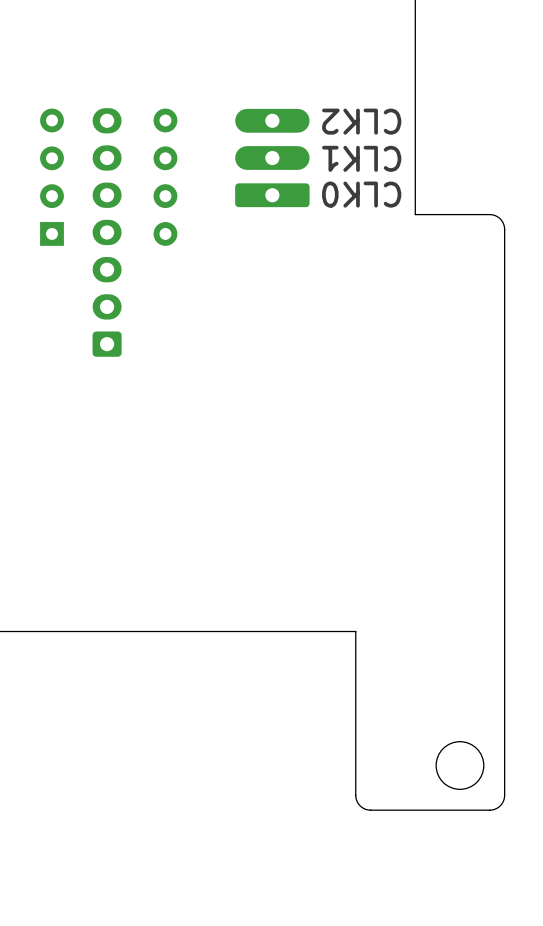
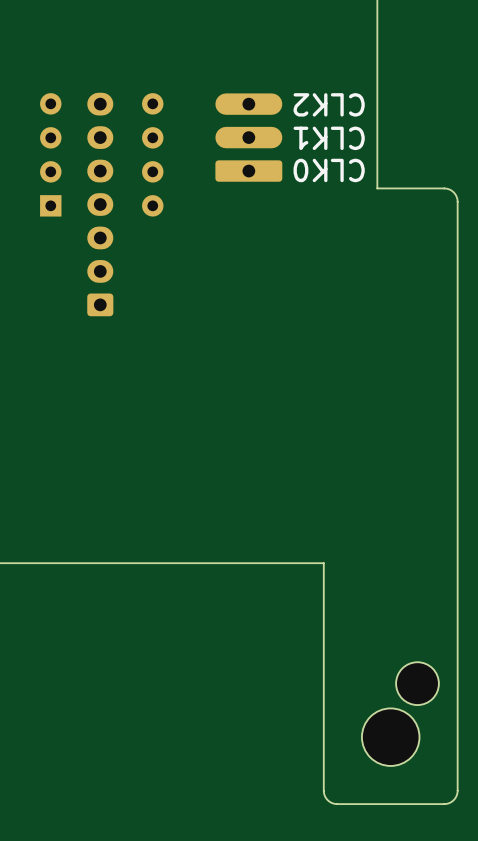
board edge: (504, 795) (500, 805) (489, 810) (368, 810) (360, 805) (355, 795) -> (457, 710) (457, 792) (453, 800) (444, 804) (337, 804) (329, 801) (323, 790) (323, 710)
part: none -> (390, 737)

